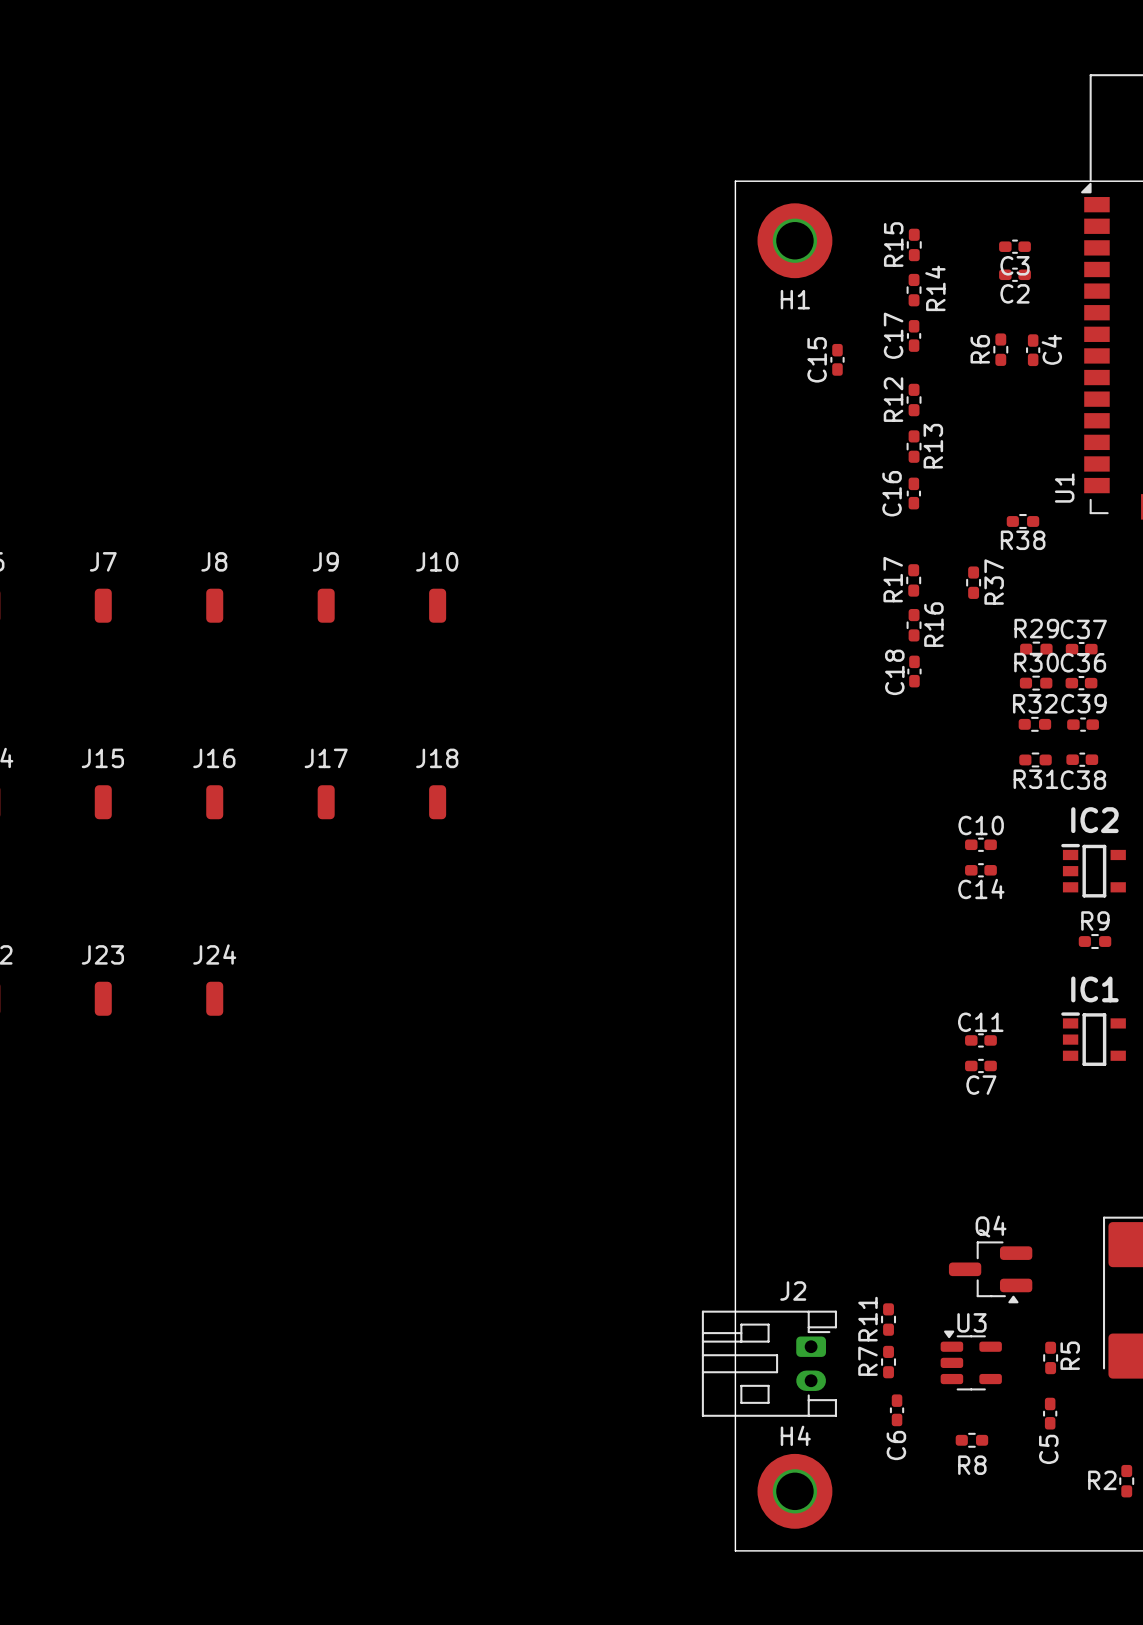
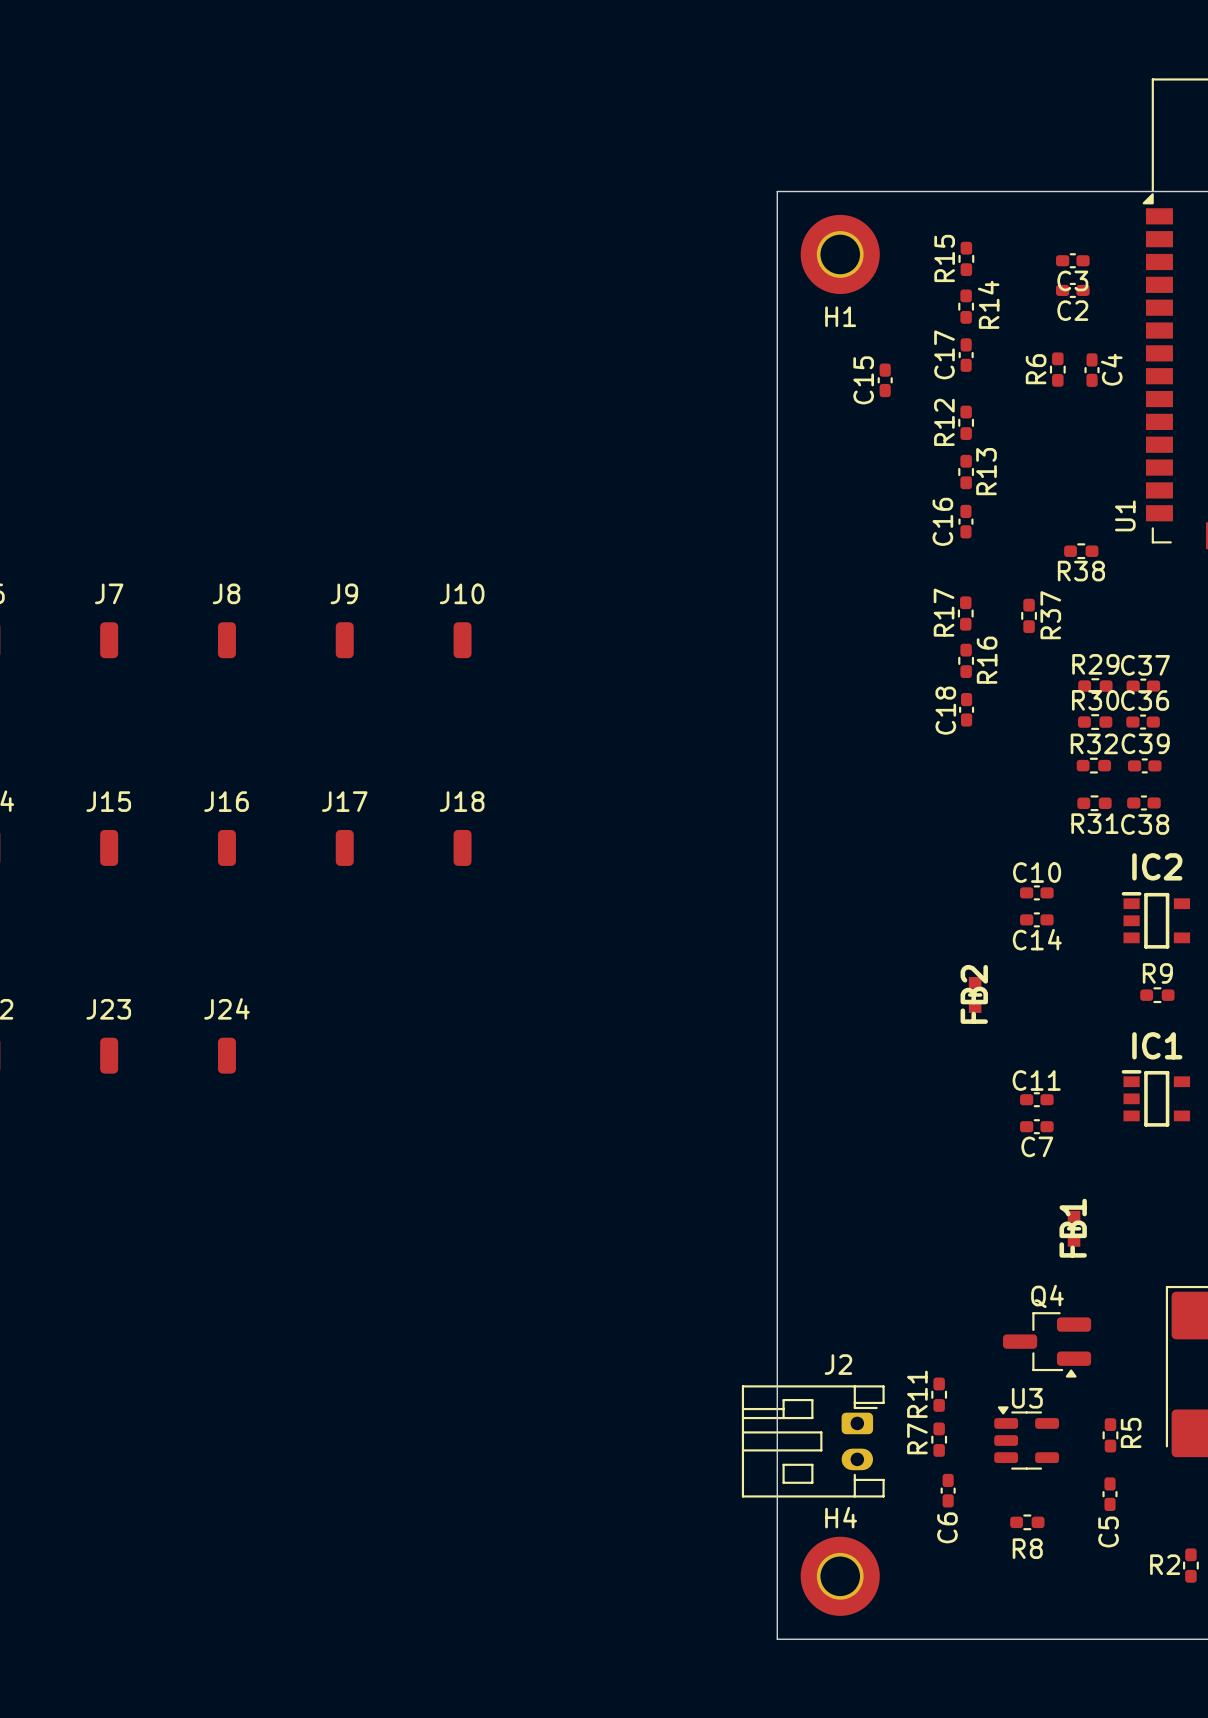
FB2: none -> (975, 994)
FB1: none -> (1074, 1228)

